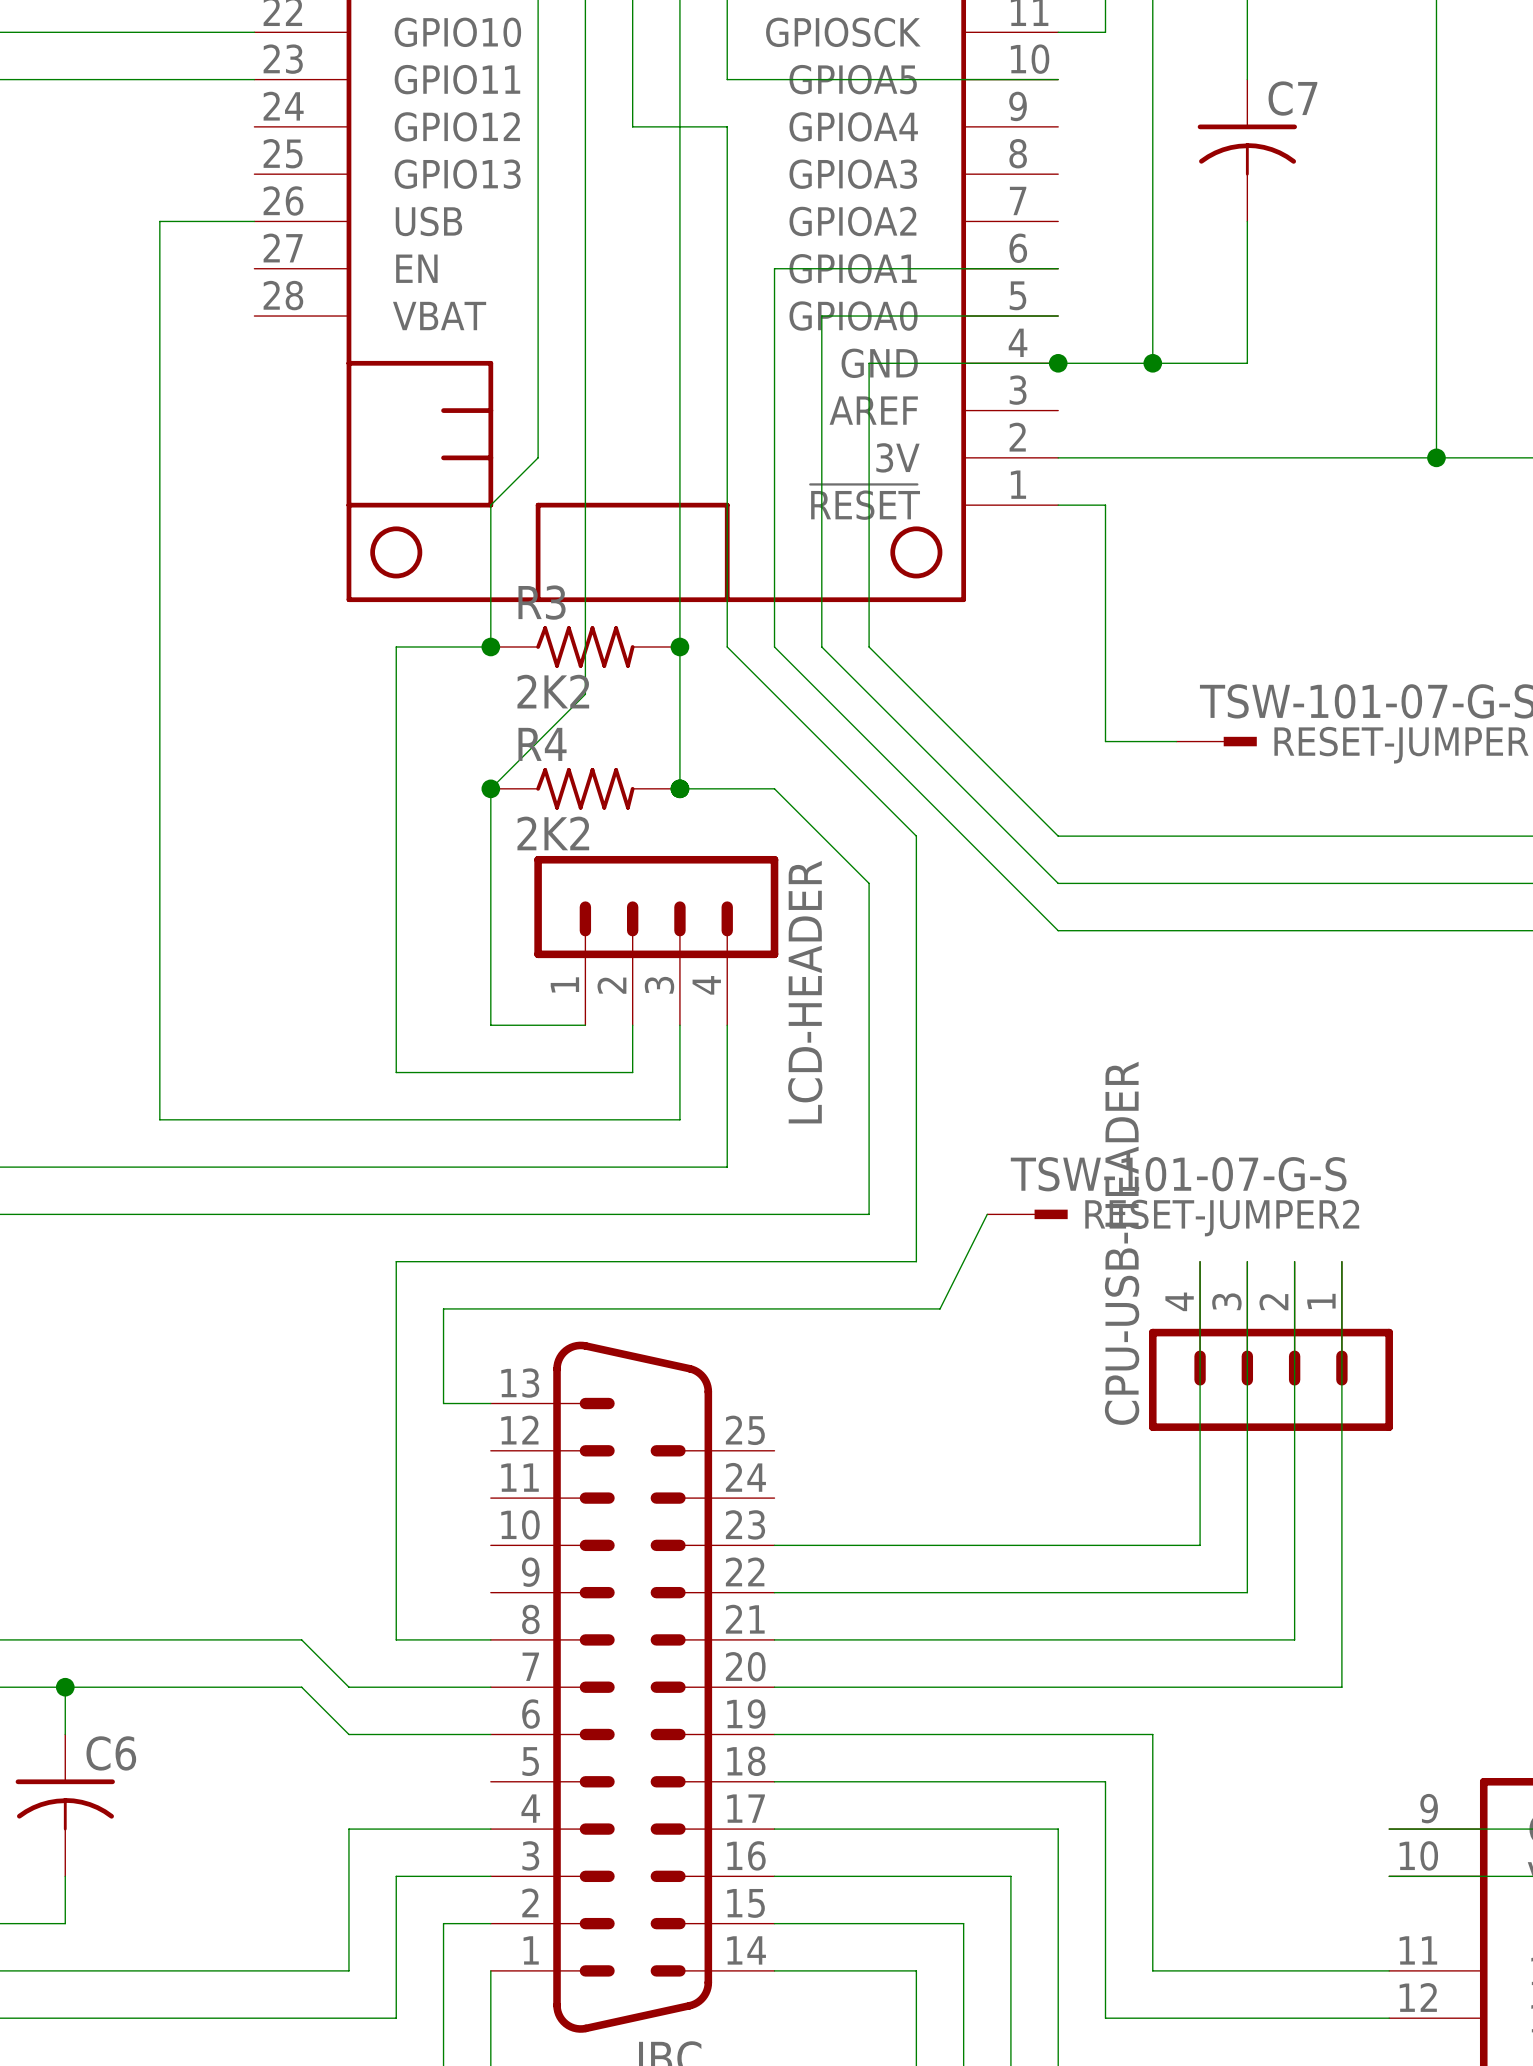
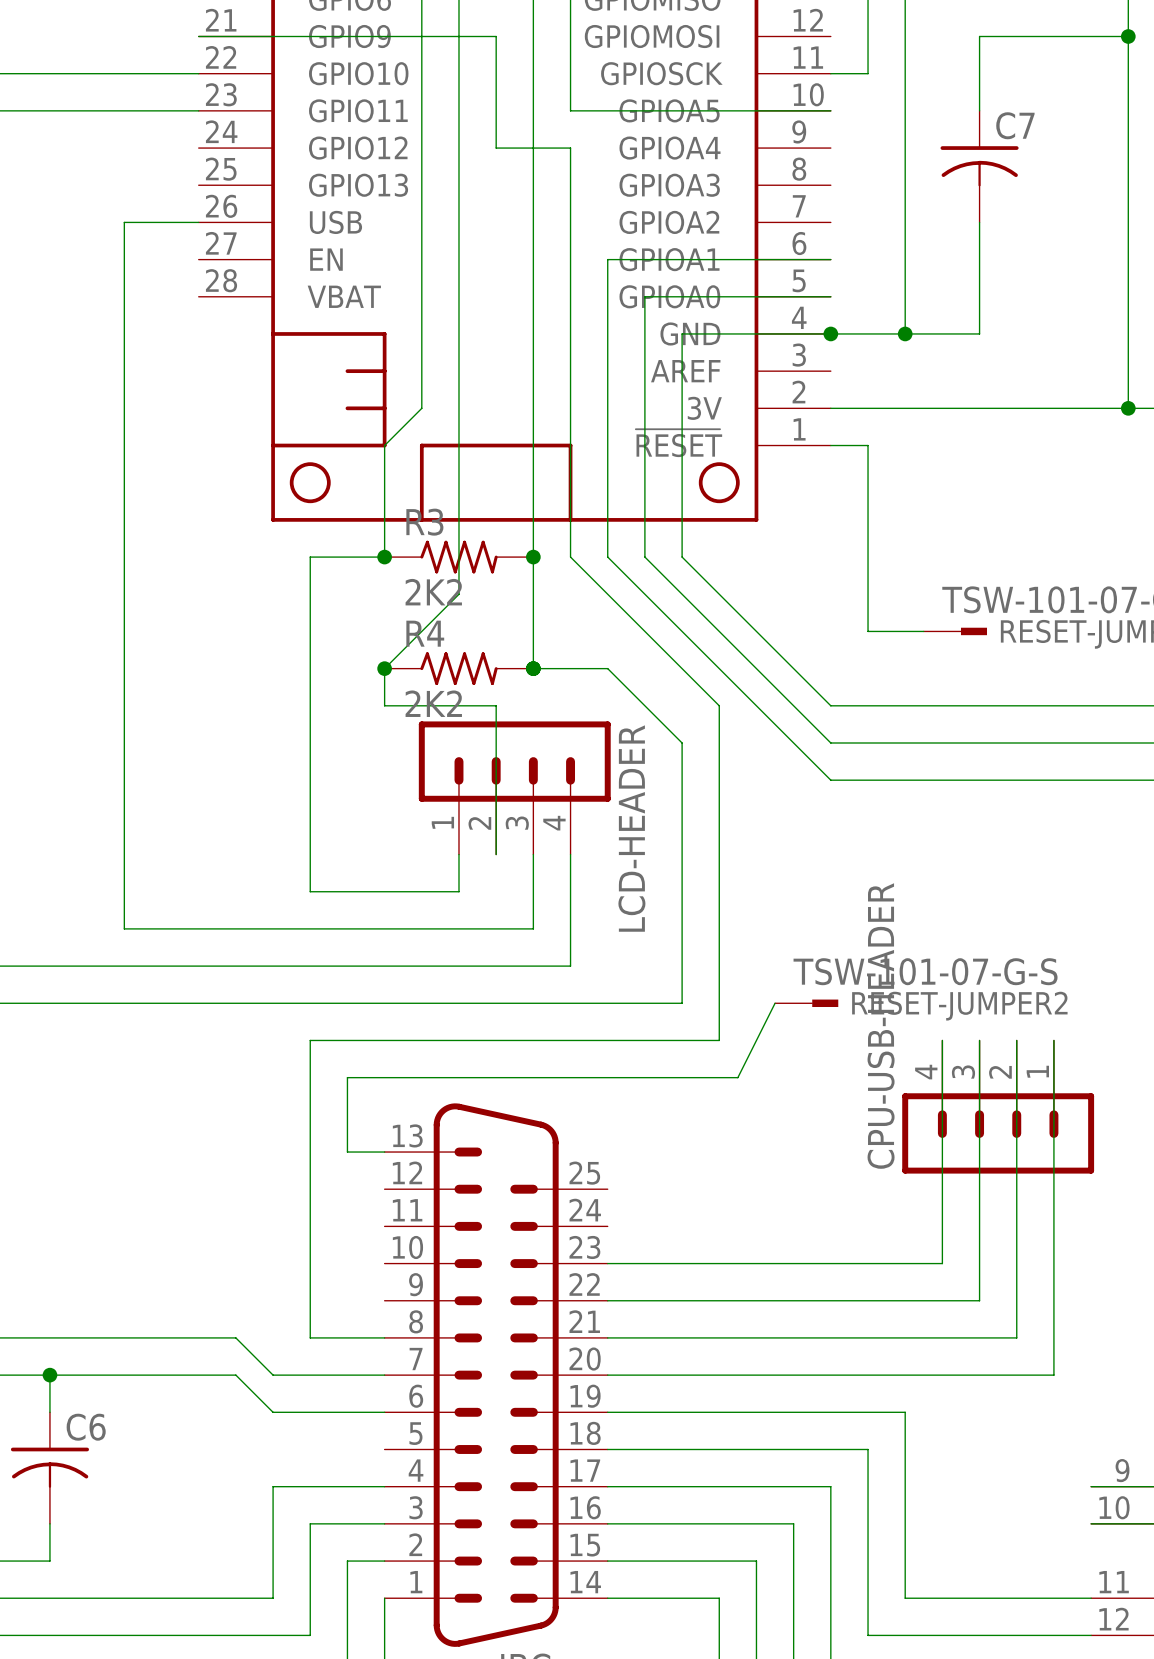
wire: (490, 836) (490, 1025) (585, 1025) -> (384, 705) (496, 705) (496, 854)
wire: (632, 1025) (632, 1072) (585, 1072) -> (458, 854) (458, 891)

